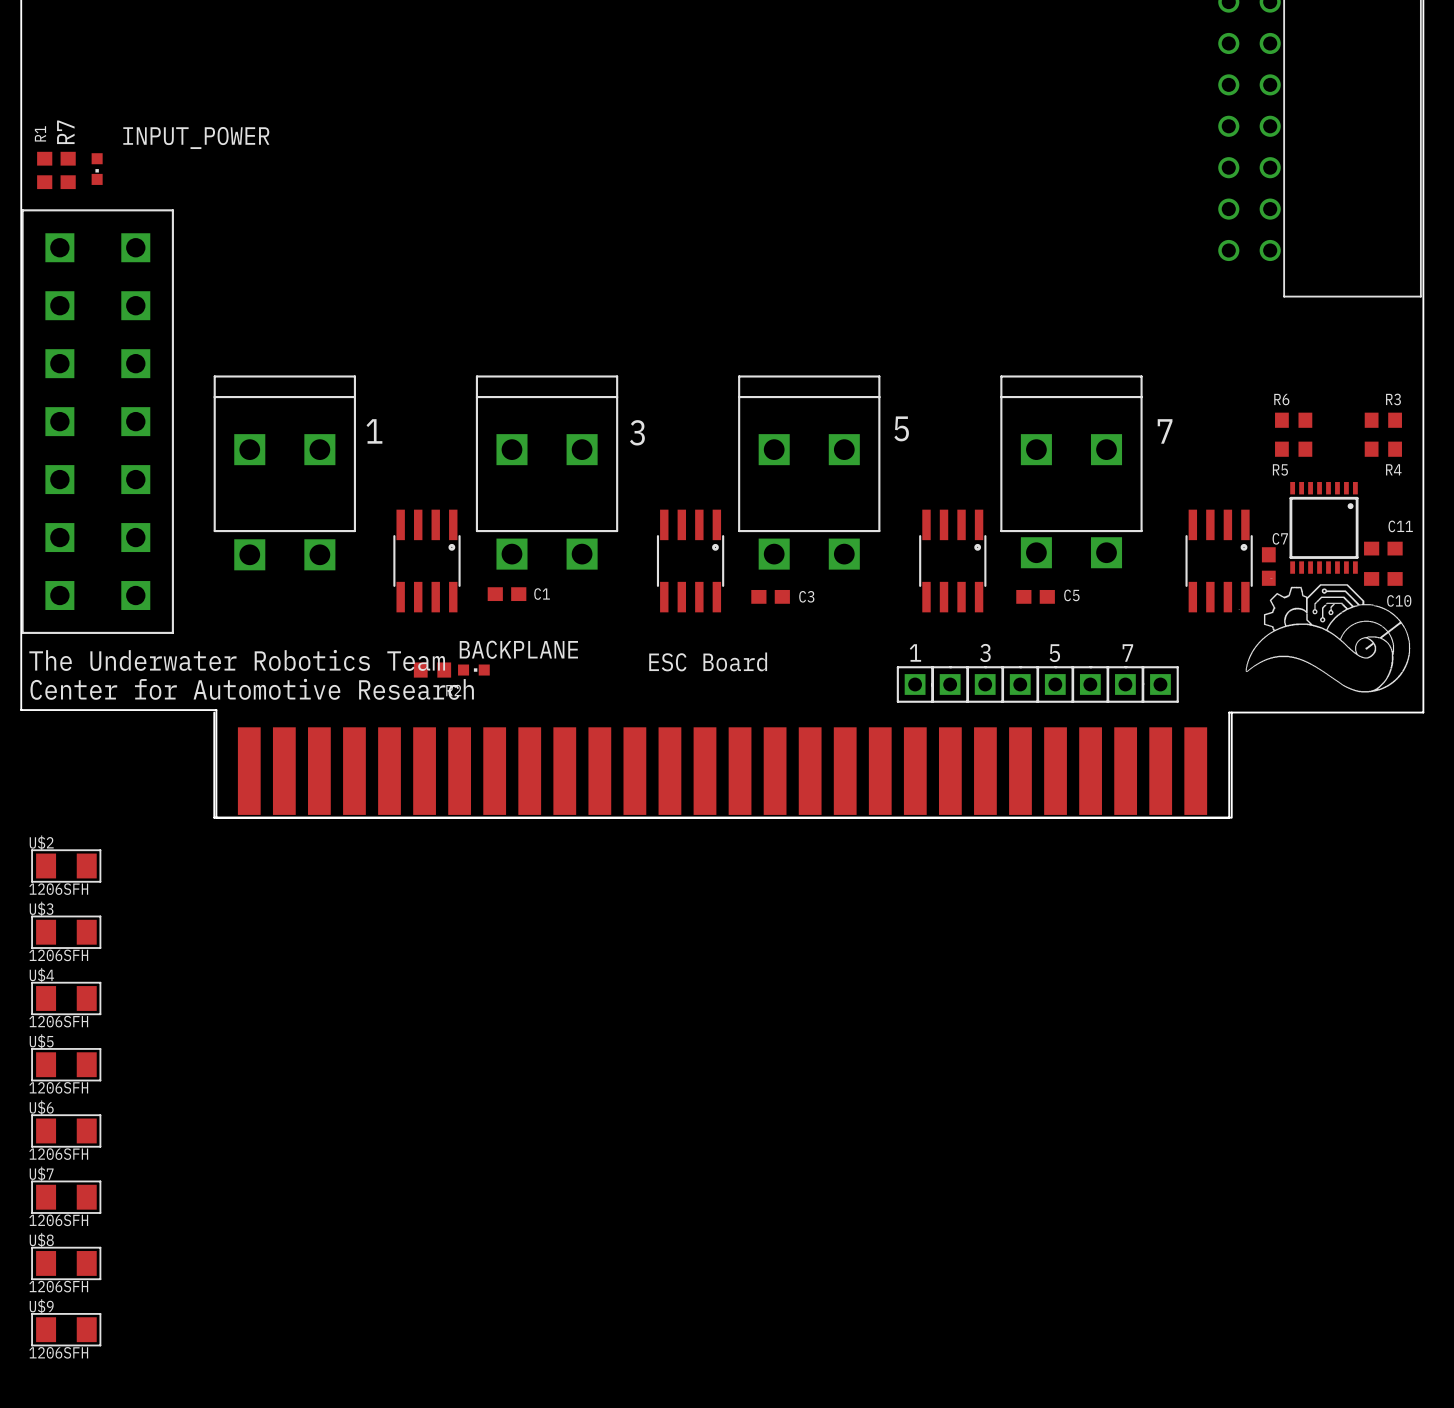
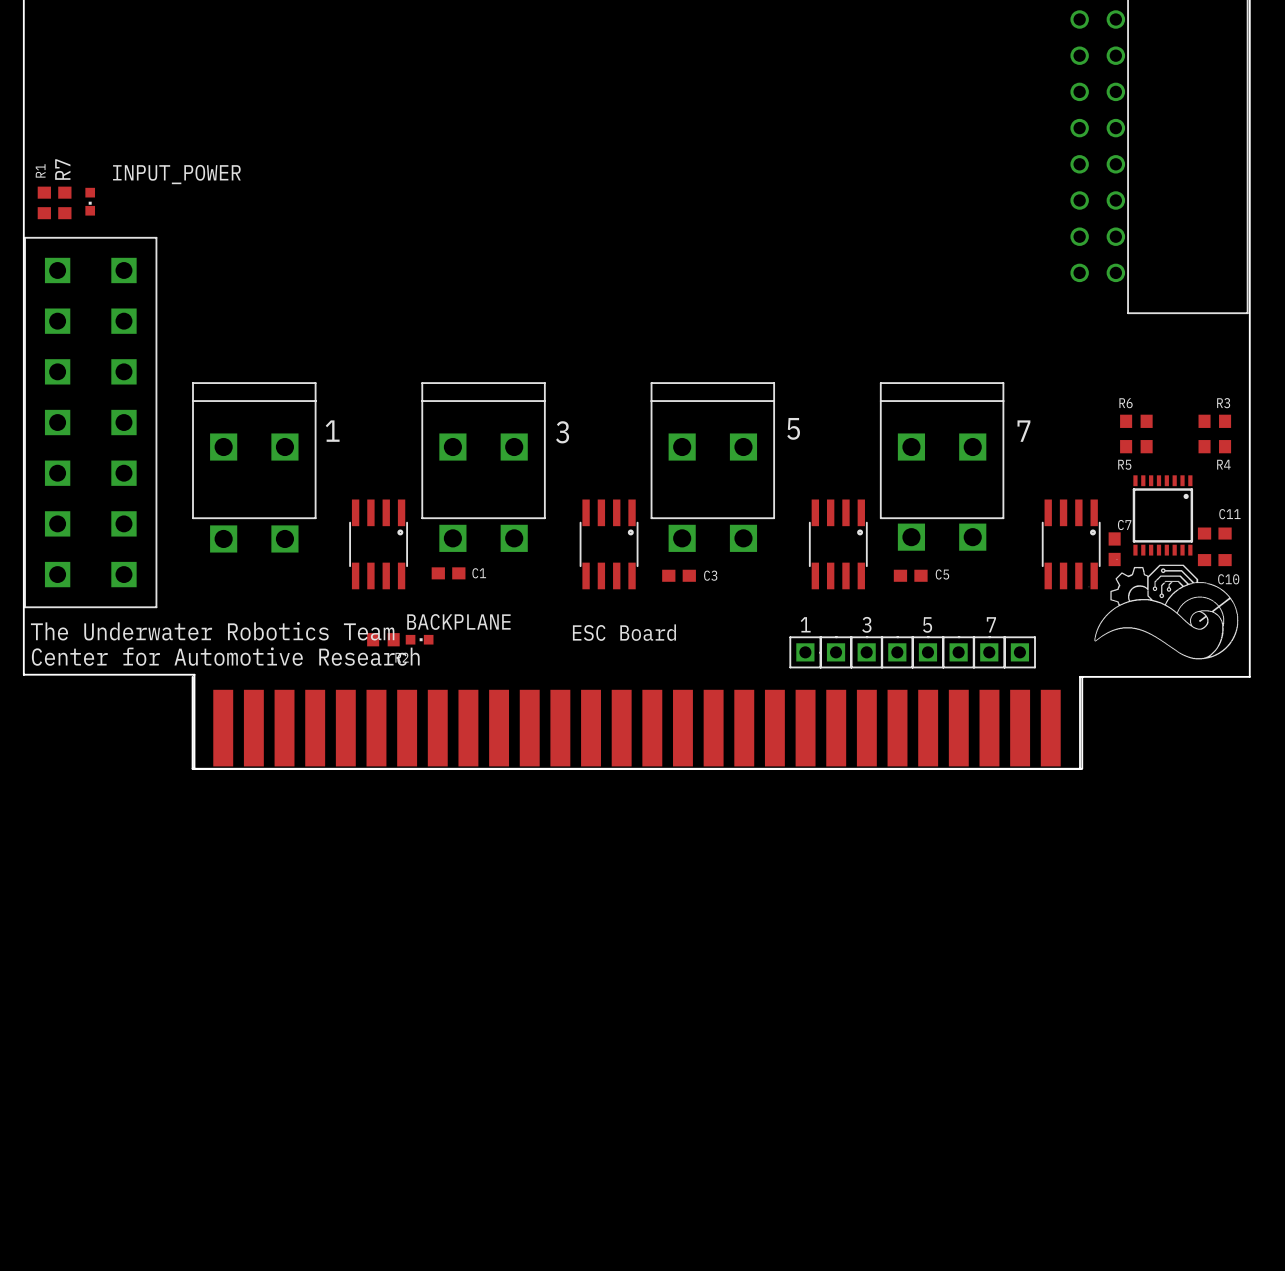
U$2: 1206SFH (66, 866) -> none
U$3: 1206SFH (66, 932) -> none
U$4: 1206SFH (66, 998) -> none
U$5: 1206SFH (66, 1064) -> none
U$6: 1206SFH (66, 1130) -> none
U$7: 1206SFH (66, 1197) -> none
U$8: 1206SFH (66, 1263) -> none
U$9: 1206SFH (66, 1329) -> none

